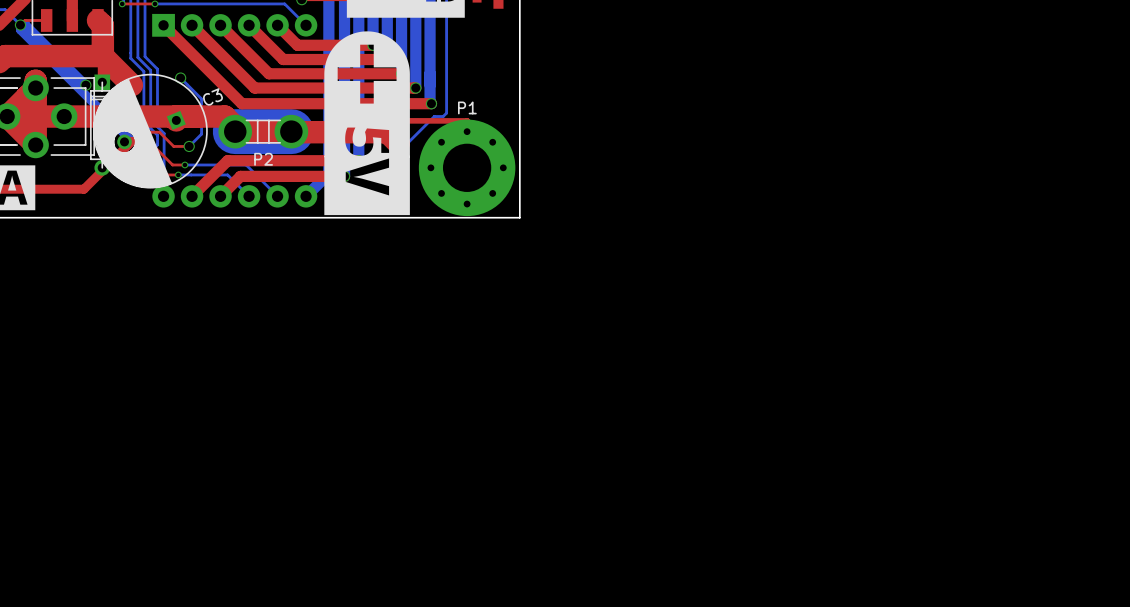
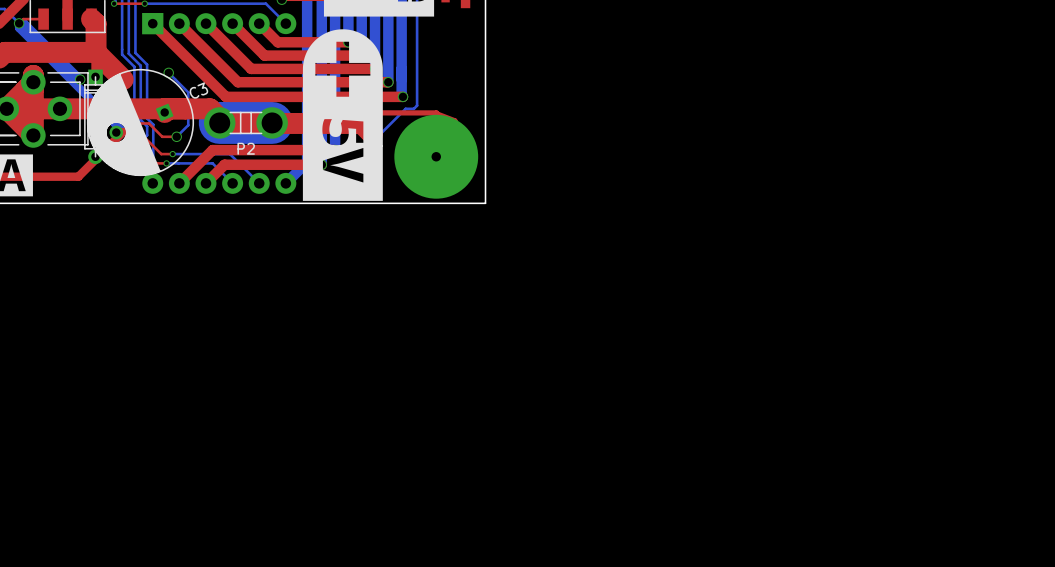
P1: (467, 167) -> none
part: none -> (436, 156)

